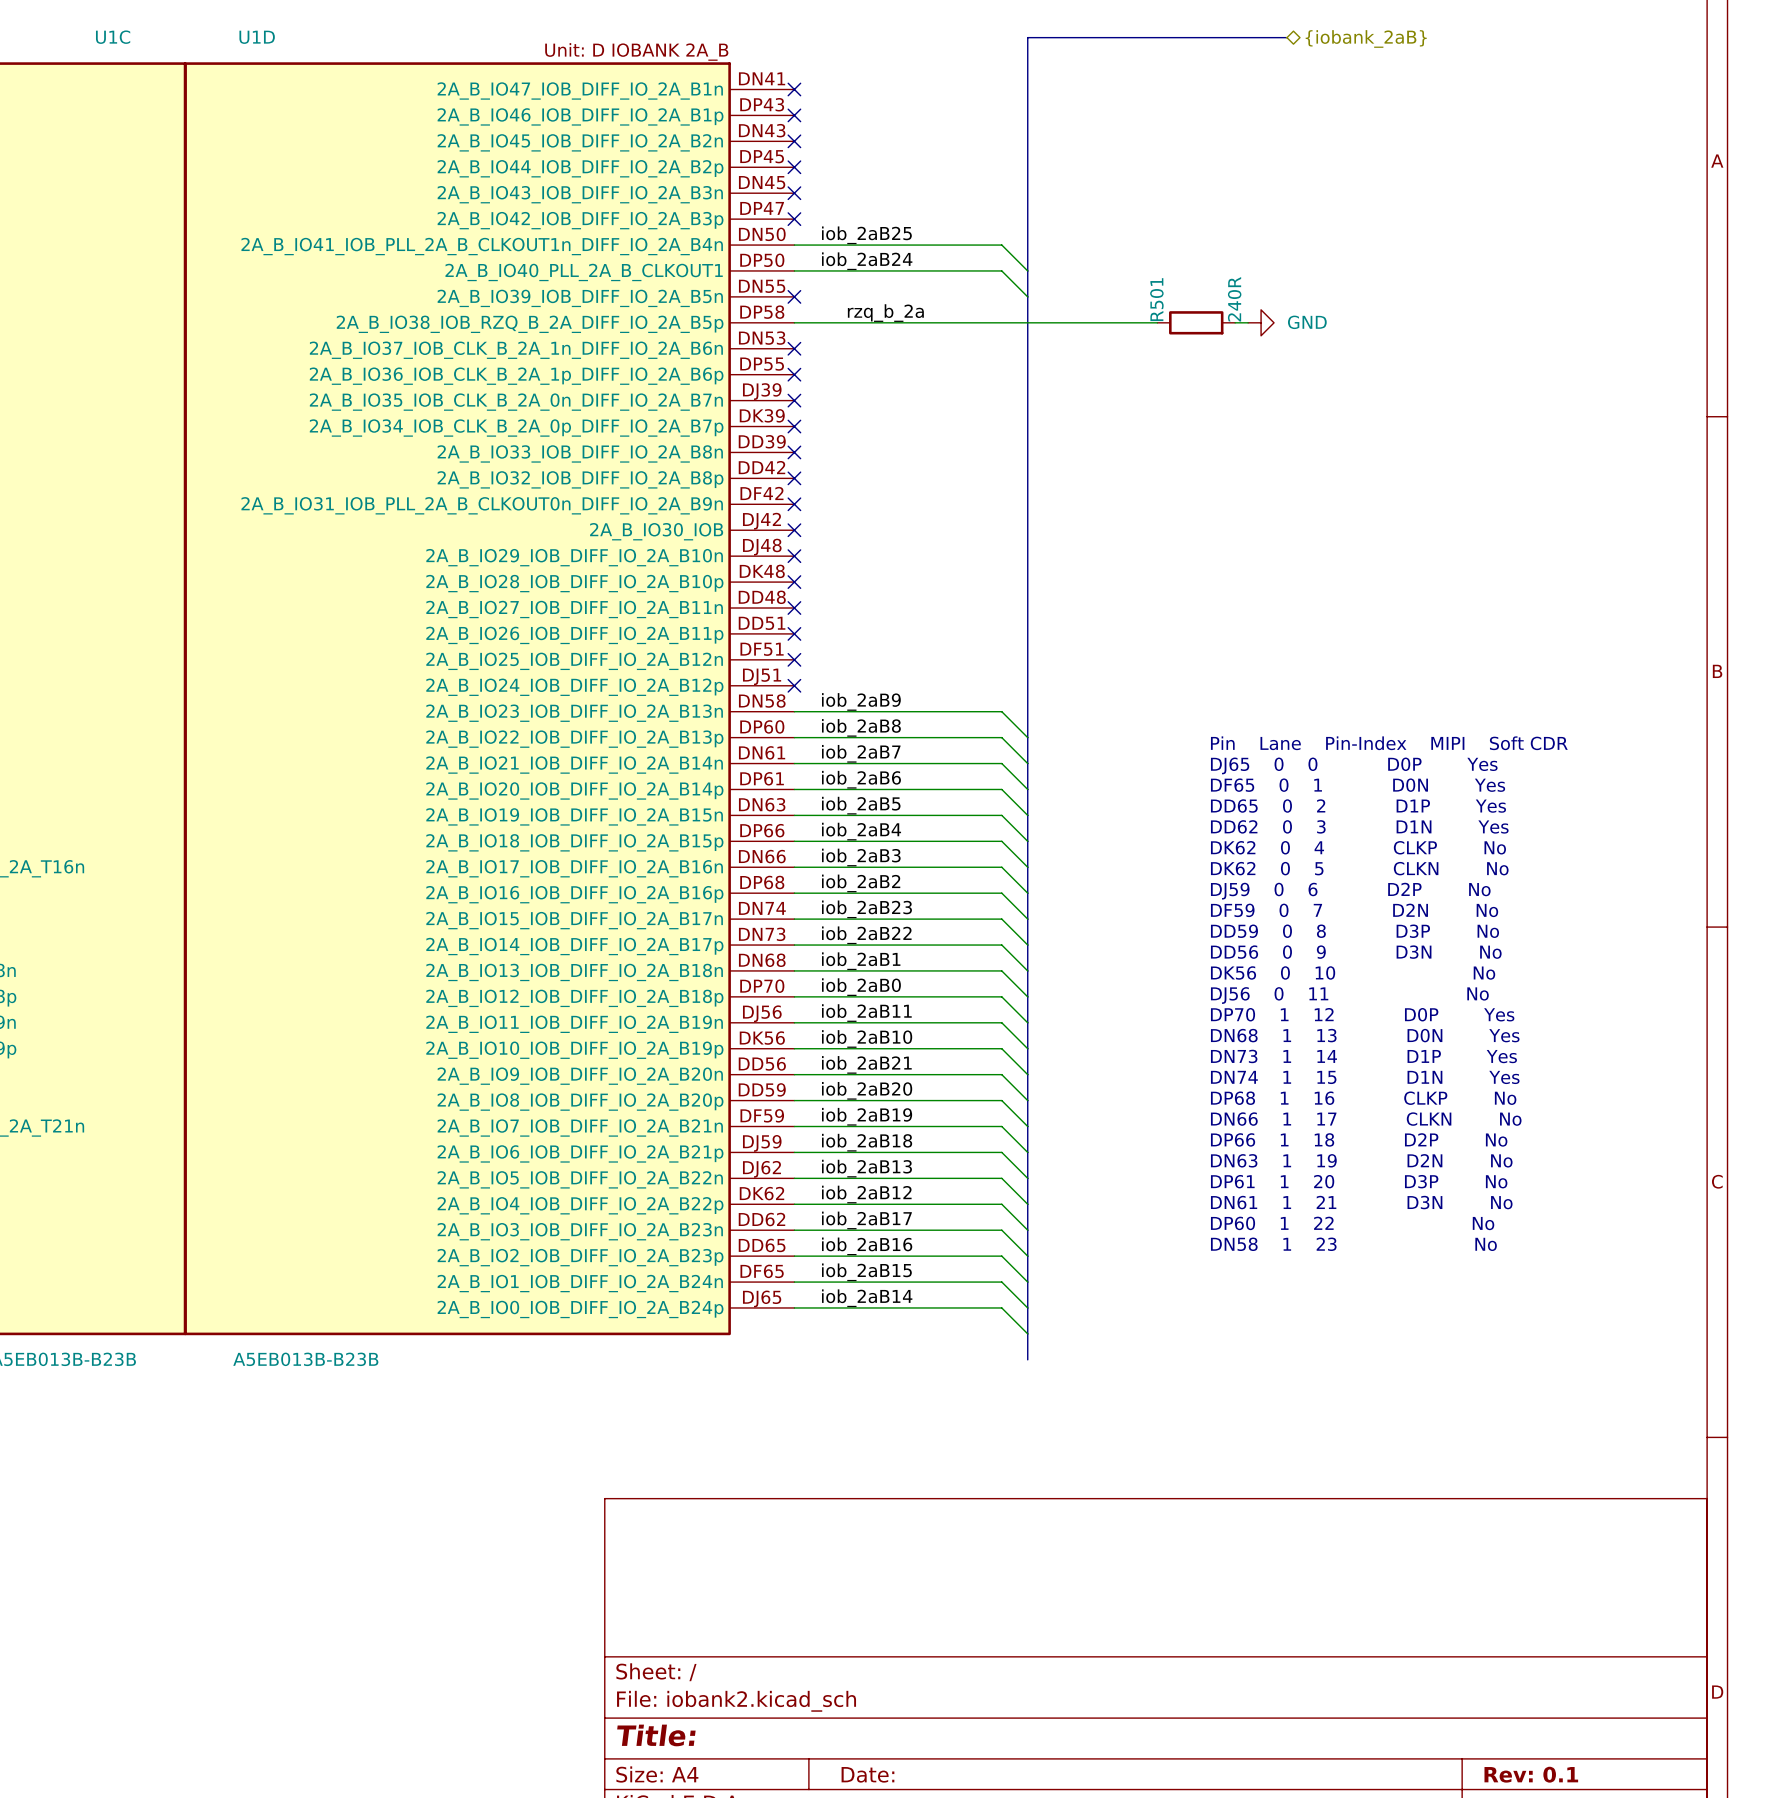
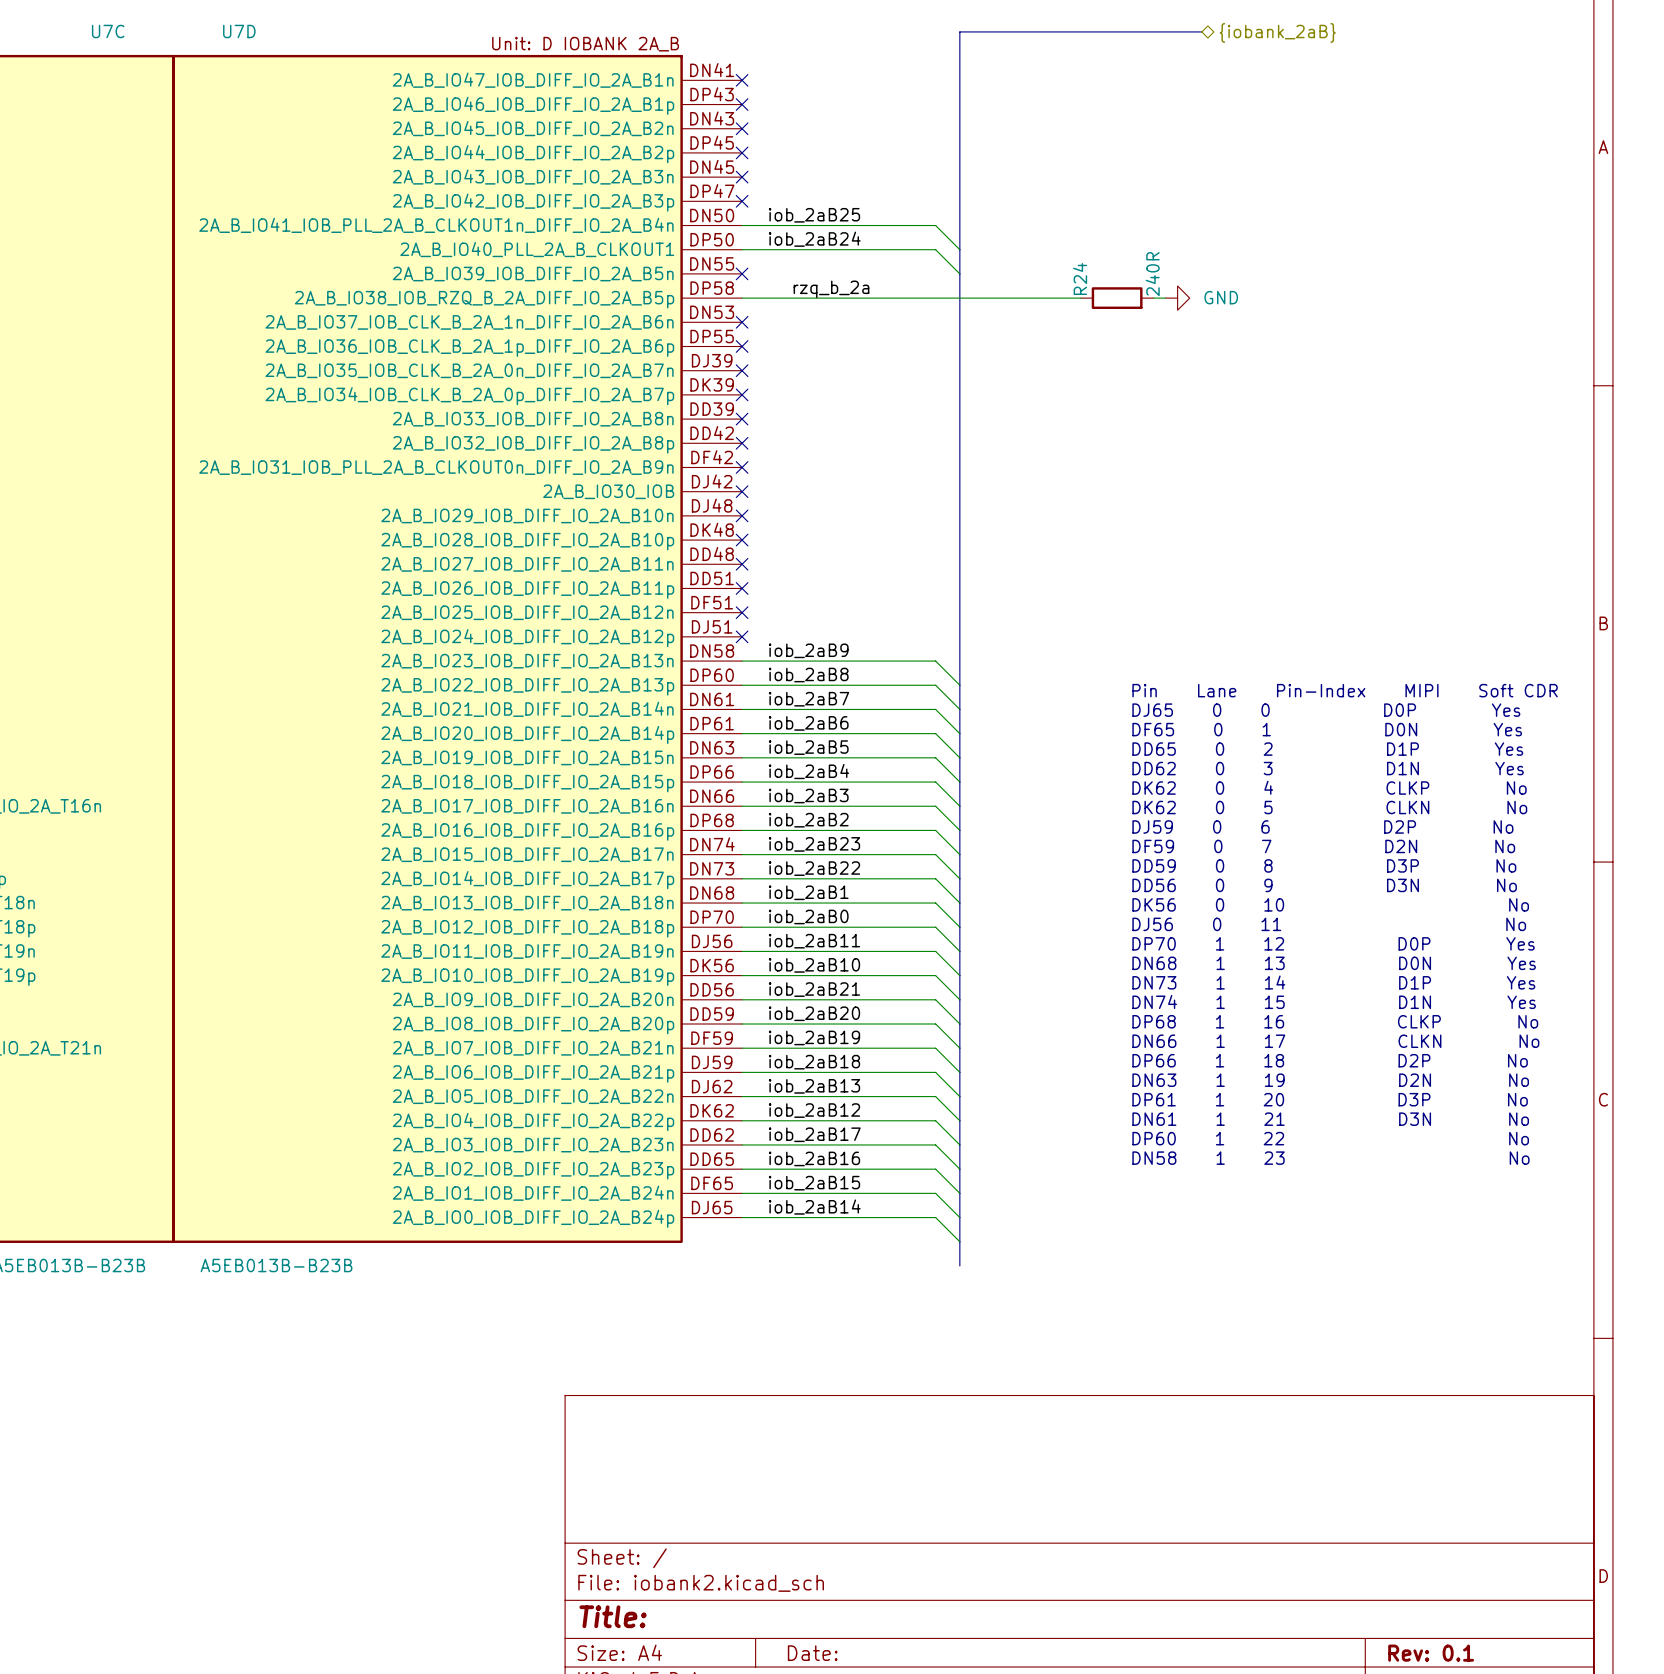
U1C name: U1C (113, 37) -> U7C (108, 31)
U1D name: U1D (257, 37) -> U7D (239, 31)
R501 name: R501 (1156, 299) -> R24 (1080, 279)

